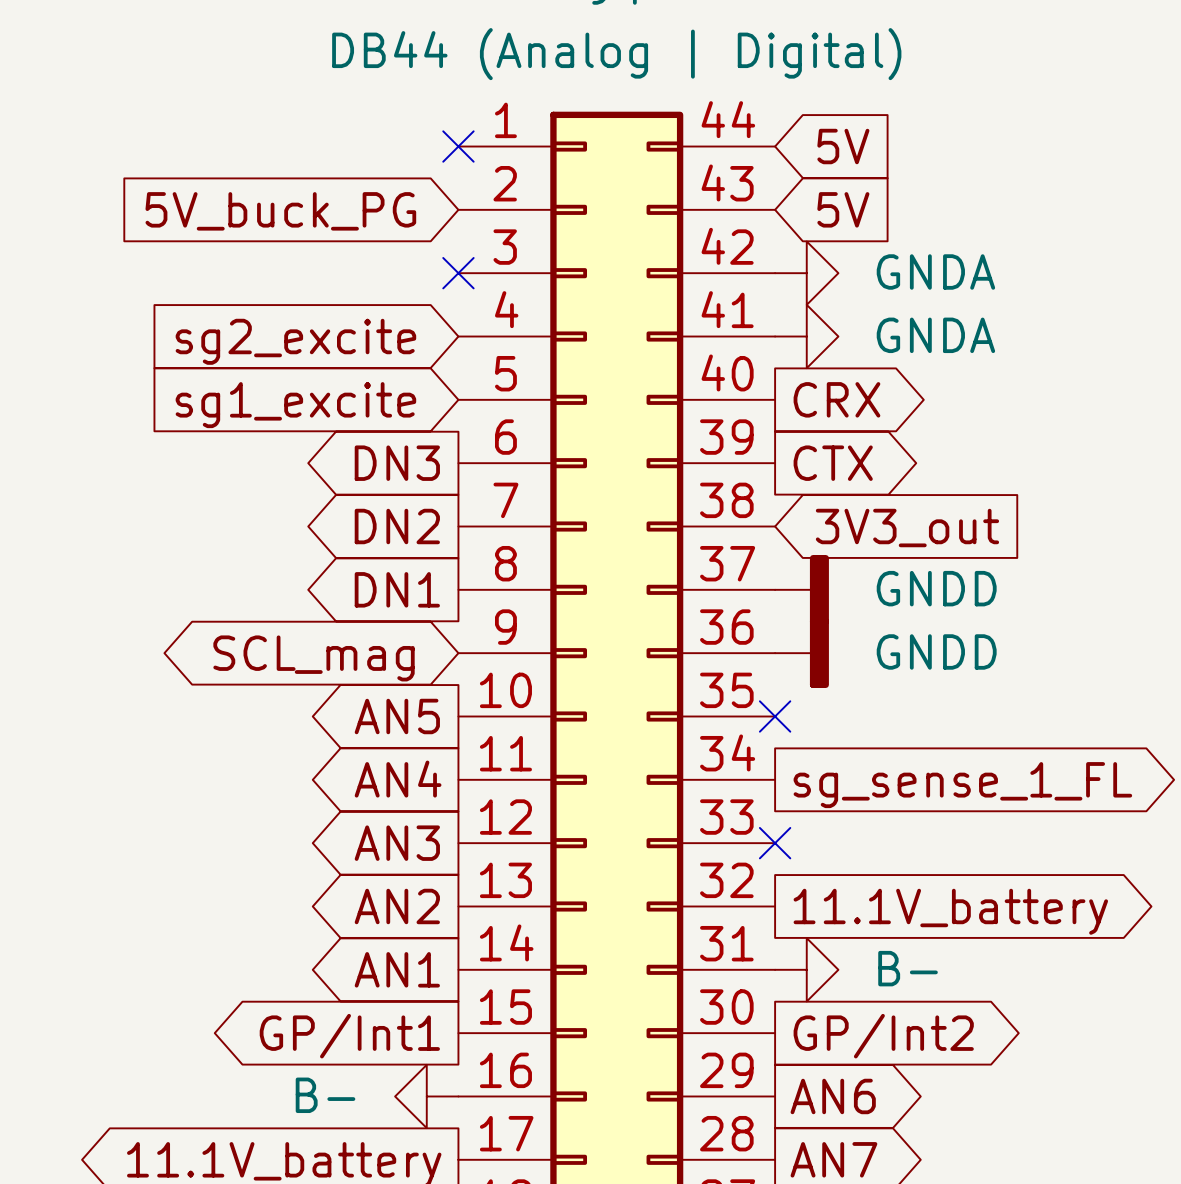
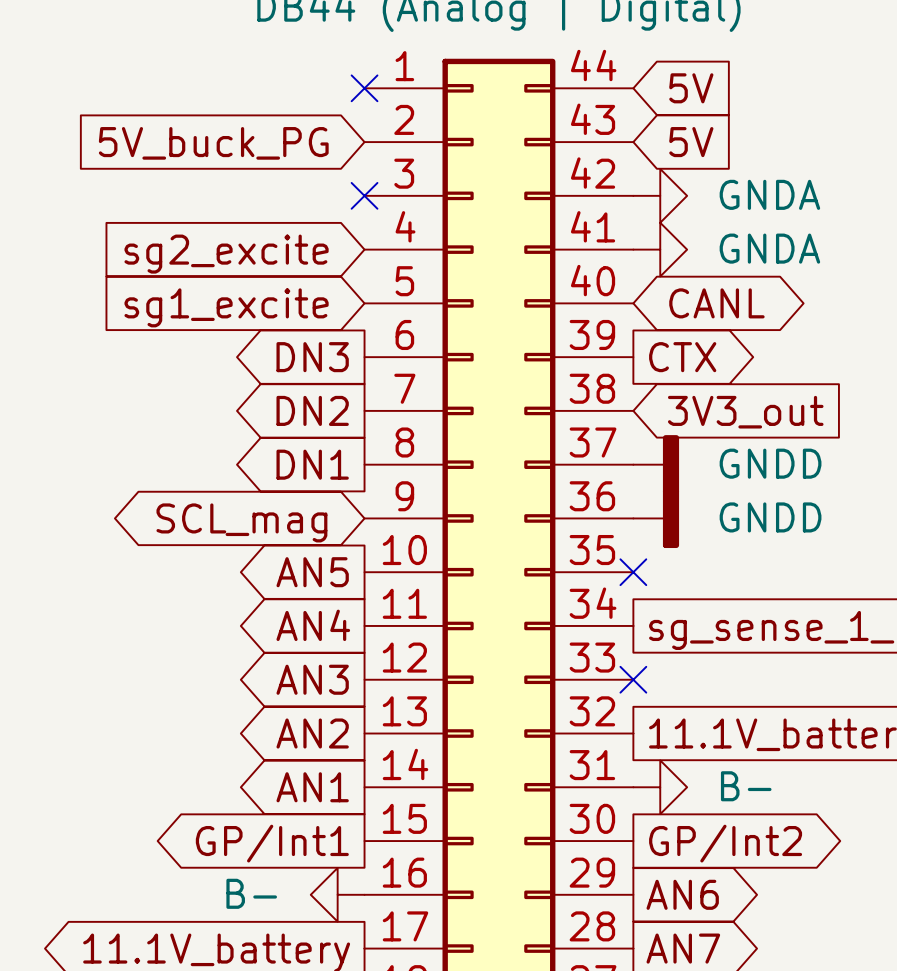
global label shape: output (836, 399) -> bidirectional (716, 303)
global label: CRX (836, 399) -> CANL (716, 303)

